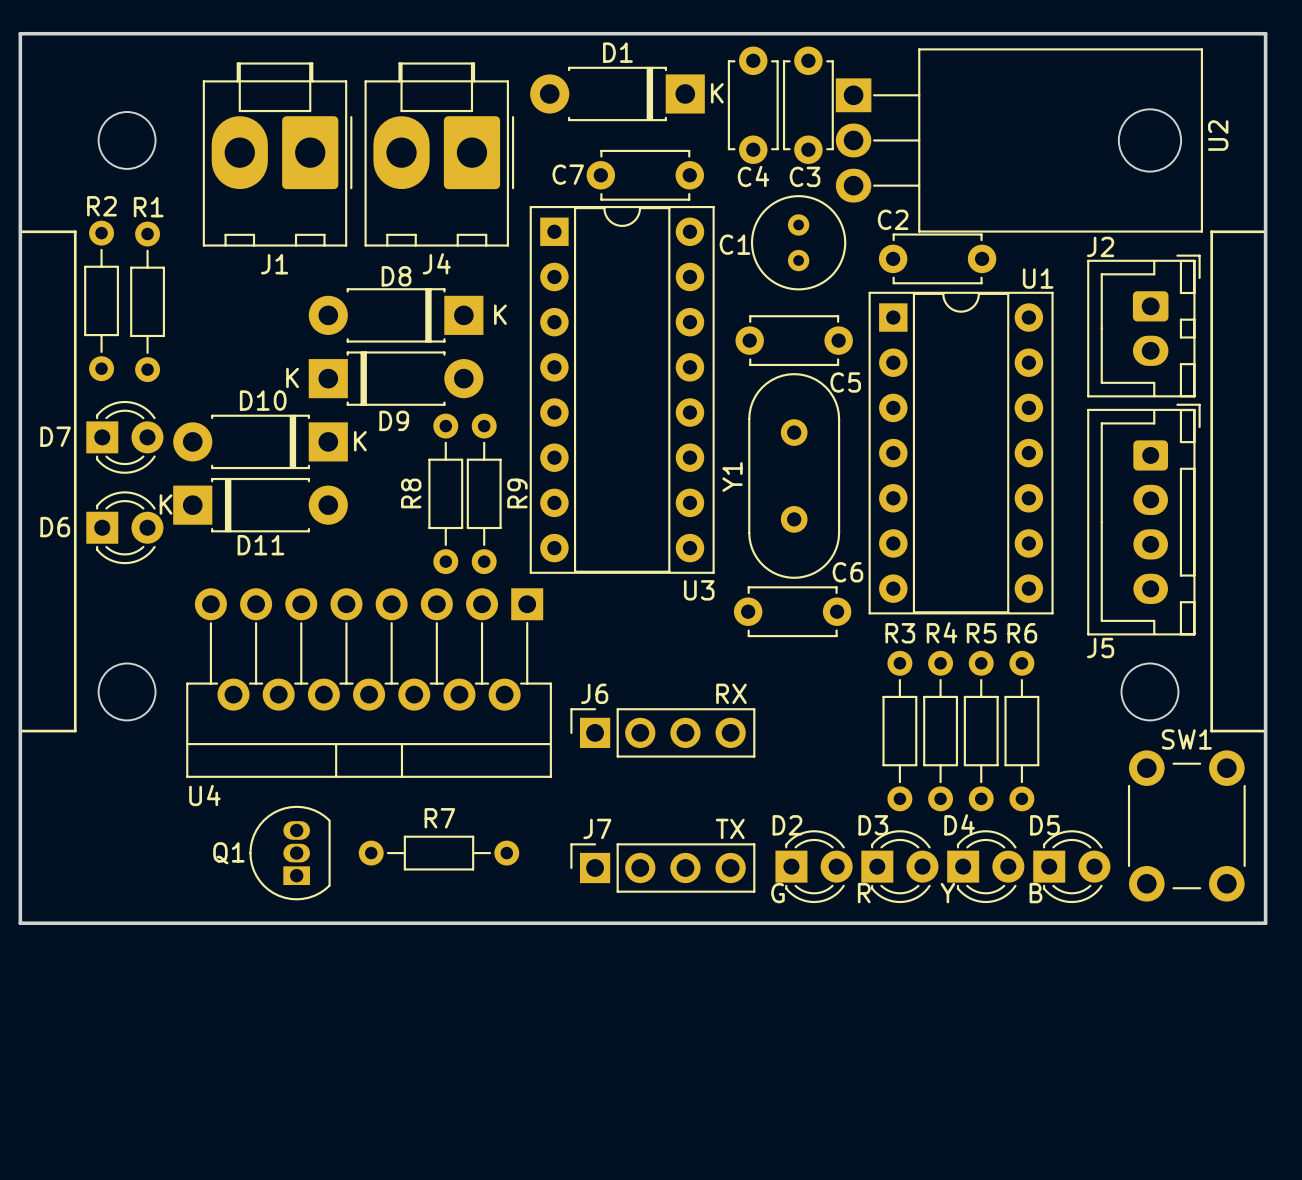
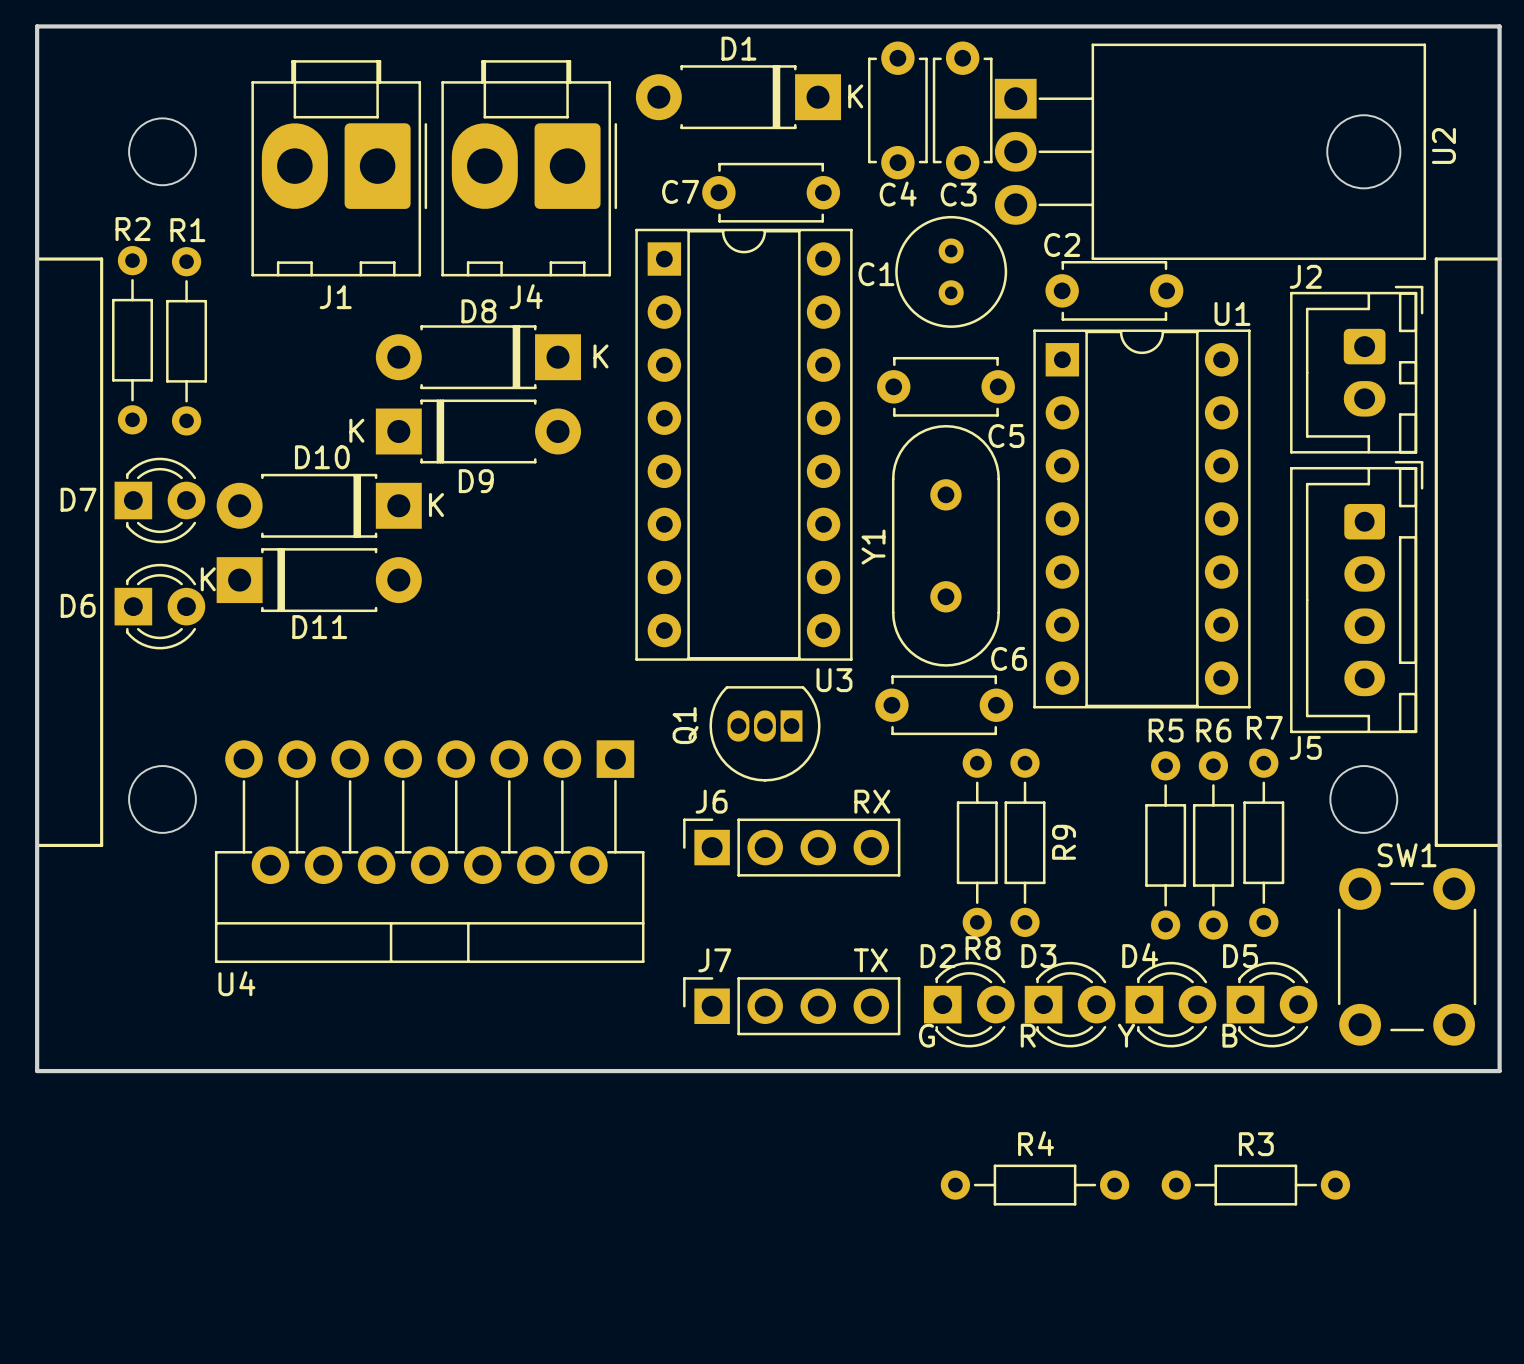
R8 name rotation: 0° (411, 493) -> 90° clockwise (983, 948)
R8 name position: R8 (411, 493) -> R8 (983, 948)
R8 position: (445, 493) -> (977, 842)
R9 position: (484, 493) -> (1025, 842)
U4 footprint: [186, 588, 552, 778] -> [214, 740, 645, 964]
R4 name position: R4 (942, 632) -> R4 (1036, 1143)
R3 name position: R3 (900, 633) -> R3 (1256, 1144)
R3 rotation: 0° (899, 731) -> 90° clockwise (1255, 1185)
R3 position: (899, 731) -> (1255, 1185)
R4 rotation: 0° (940, 731) -> 90° clockwise (1035, 1185)
R4 position: (940, 731) -> (1035, 1185)
R7 name position: R7 (439, 818) -> R7 (1264, 727)
Q1 rotation: 0° (290, 853) -> 90° counterclockwise (764, 733)
Q1 position: (290, 853) -> (764, 733)
R7 rotation: 0° (439, 853) -> 90° clockwise (1263, 842)
R7 position: (439, 853) -> (1263, 842)

